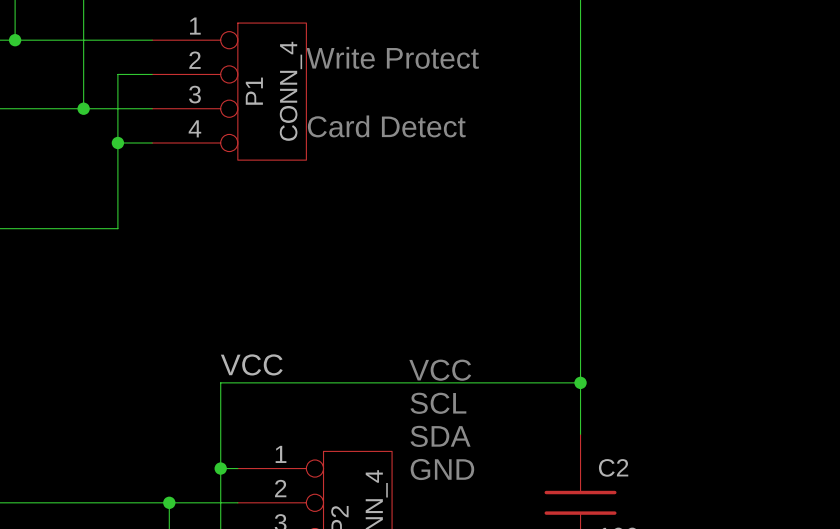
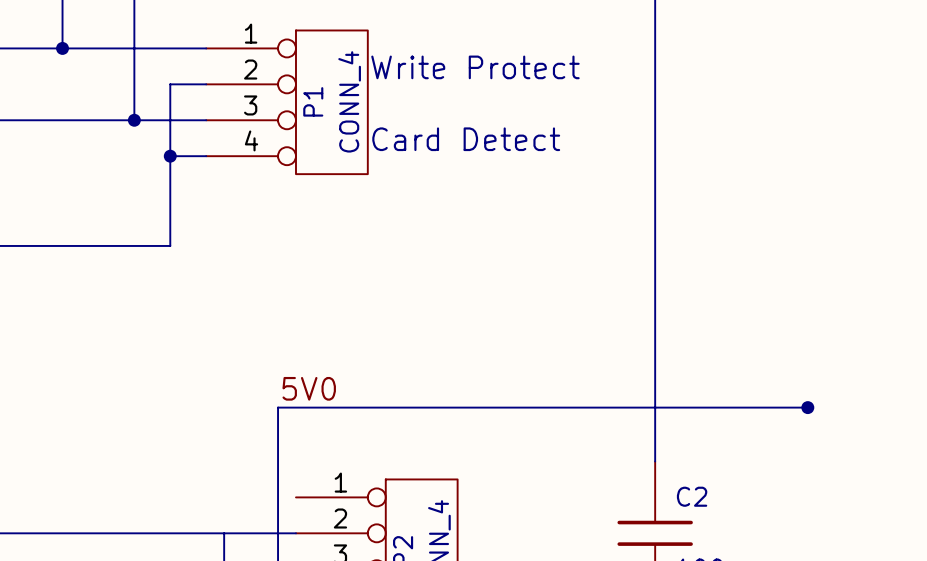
label: VCC (251, 364) -> 5V0 (309, 388)
text: VCC (440, 370) -> none
wire: none -> (655, 407) (807, 407)
junction: (580, 382) -> none
junction: none -> (807, 407)
text: SCL (438, 403) -> none
text: SDA (440, 436) -> none
wire: (220, 468) (237, 468) -> none
junction: (220, 468) -> none
text: GND (442, 469) -> none
junction: (169, 502) -> none

